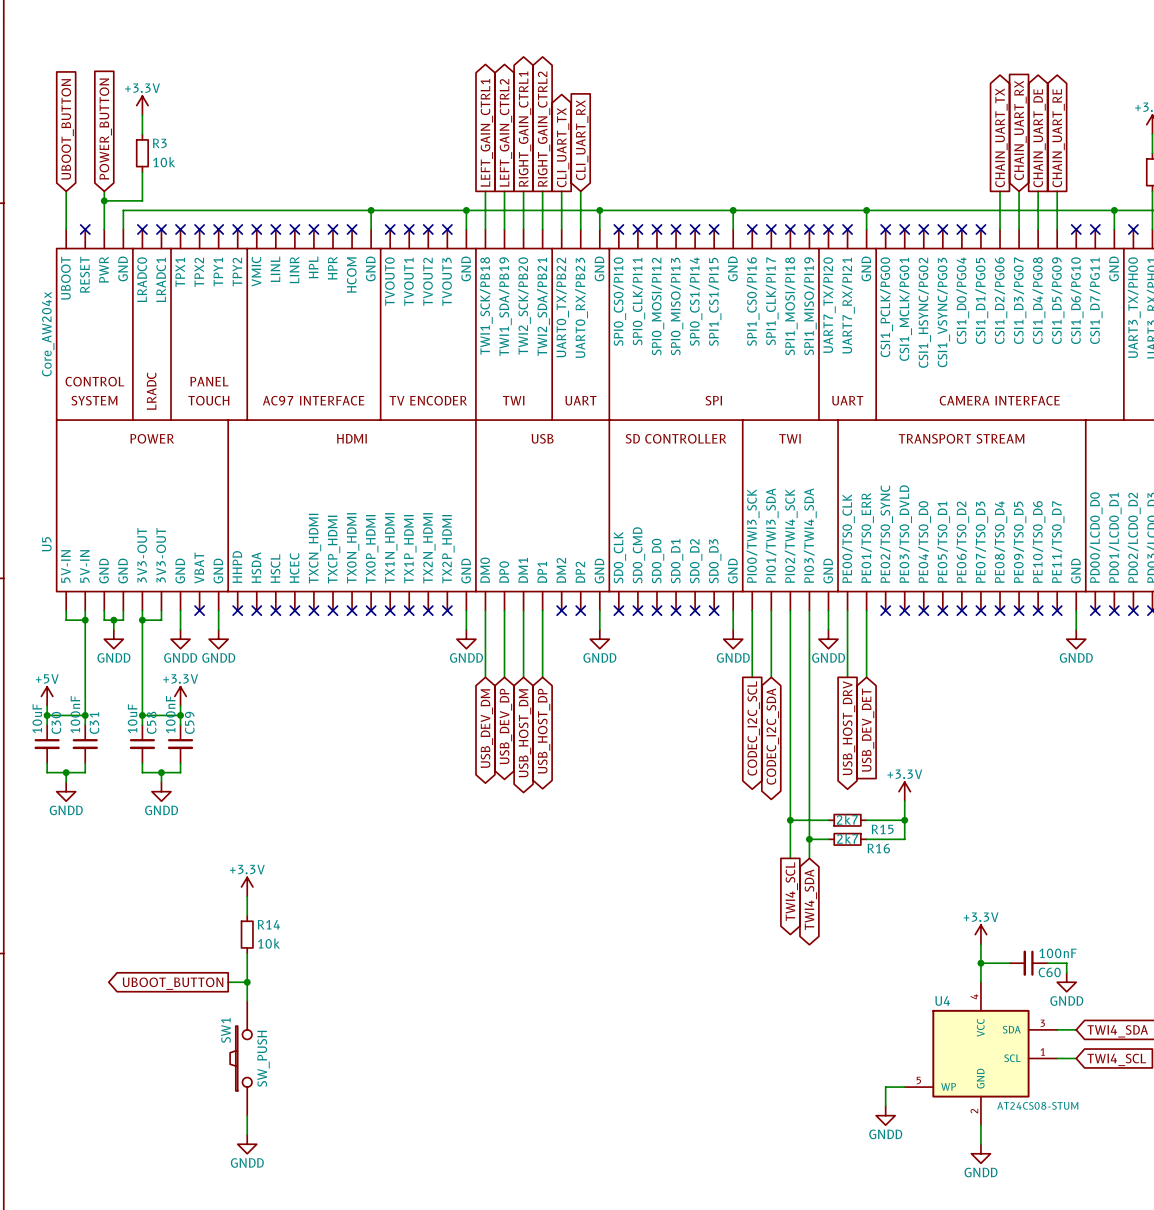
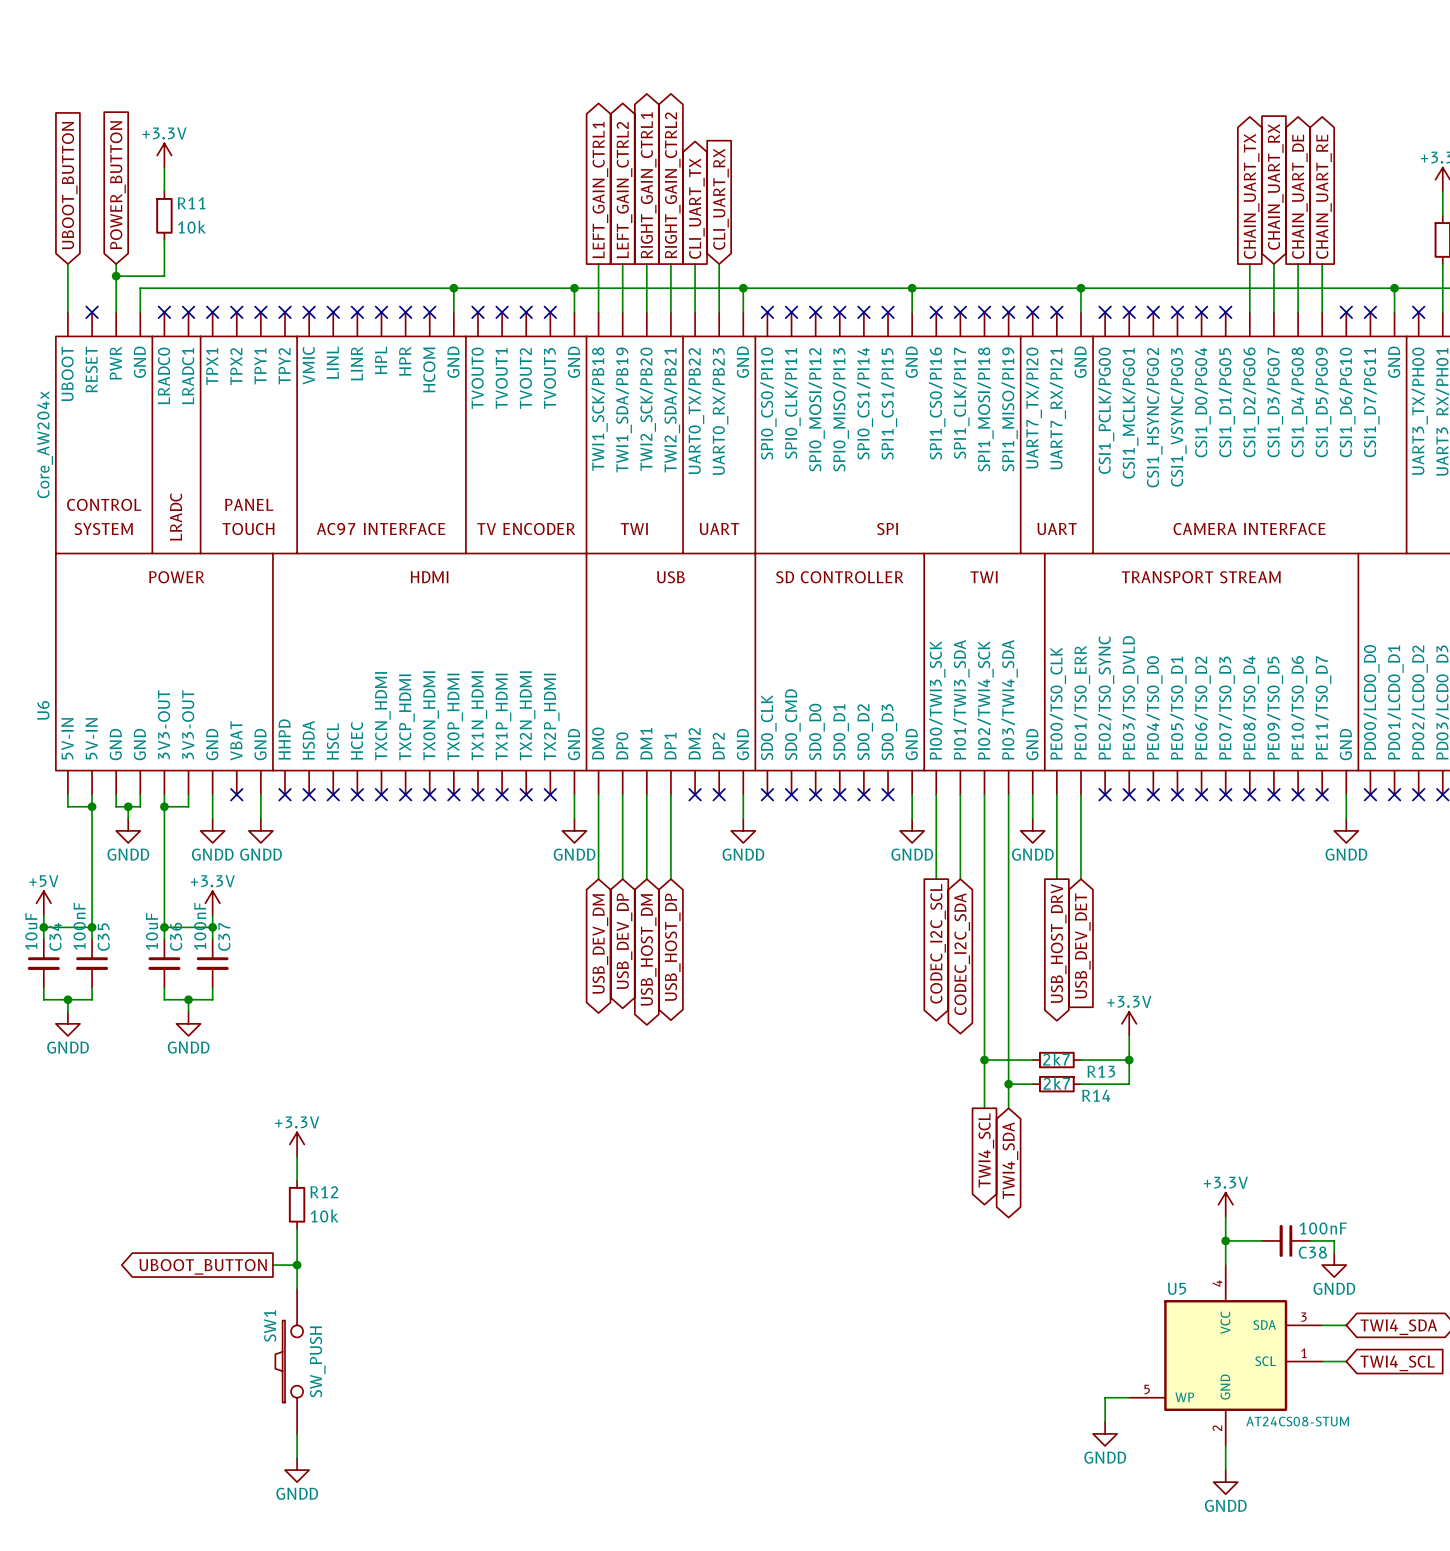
R3 name: R3 (159, 143) -> R11 (191, 203)
U5 name: U5 (46, 544) -> U6 (43, 710)
C30 name: C30 (56, 722) -> C34 (55, 936)
C58 name: C58 (151, 722) -> C36 (176, 936)
C59 name: C59 (189, 722) -> C37 (224, 936)
C31 name: C31 (94, 723) -> C35 (103, 937)
R15 name: R15 (882, 829) -> R13 (1101, 1071)
R16 name: R16 (878, 848) -> R14 (1096, 1095)
R14 name: R14 (268, 924) -> R12 (324, 1192)
C60 name: C60 (1049, 972) -> C38 (1312, 1252)
U4 name: U4 (942, 1001) -> U5 (1177, 1288)

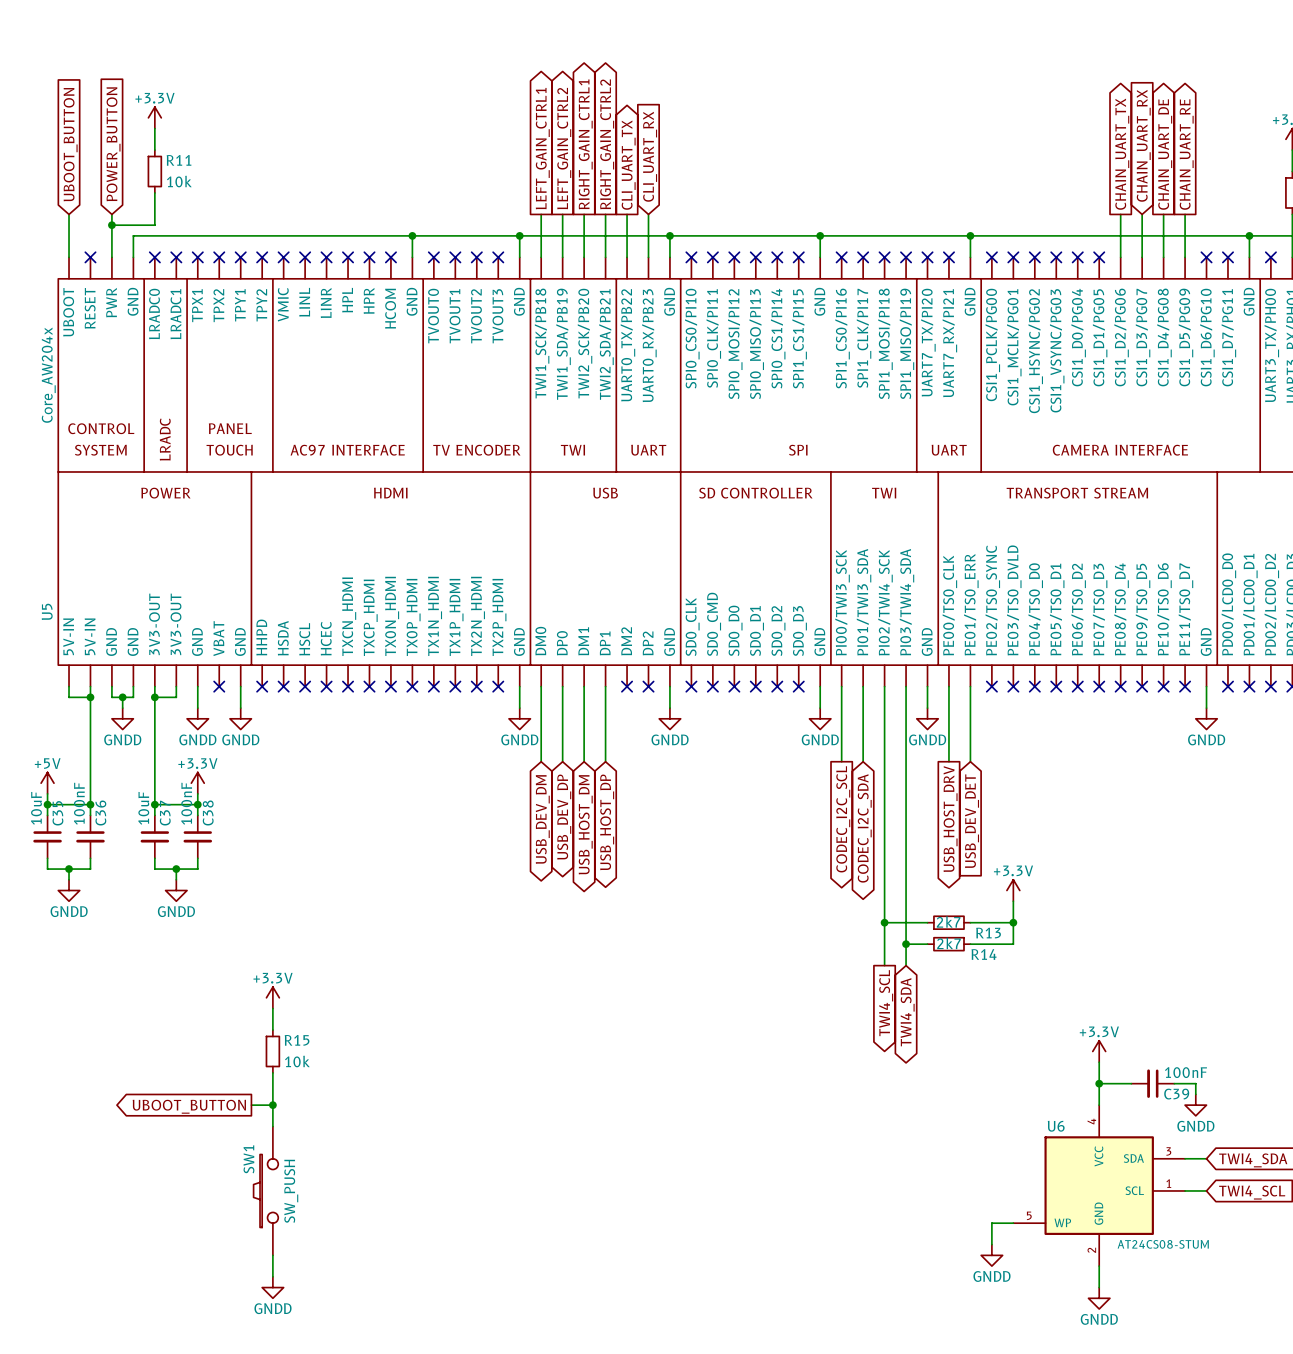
U6 name: U6 (43, 710) -> U5 (47, 611)
C34 name: C34 (55, 936) -> C35 (57, 813)
C36 name: C36 (176, 936) -> C37 (165, 813)
C37 name: C37 (224, 936) -> C38 (208, 812)
C35 name: C35 (103, 937) -> C36 (100, 813)
R12 name: R12 (324, 1192) -> R15 (297, 1040)
C38 name: C38 (1312, 1252) -> C39 (1176, 1094)
U5 name: U5 (1177, 1288) -> U6 (1056, 1126)

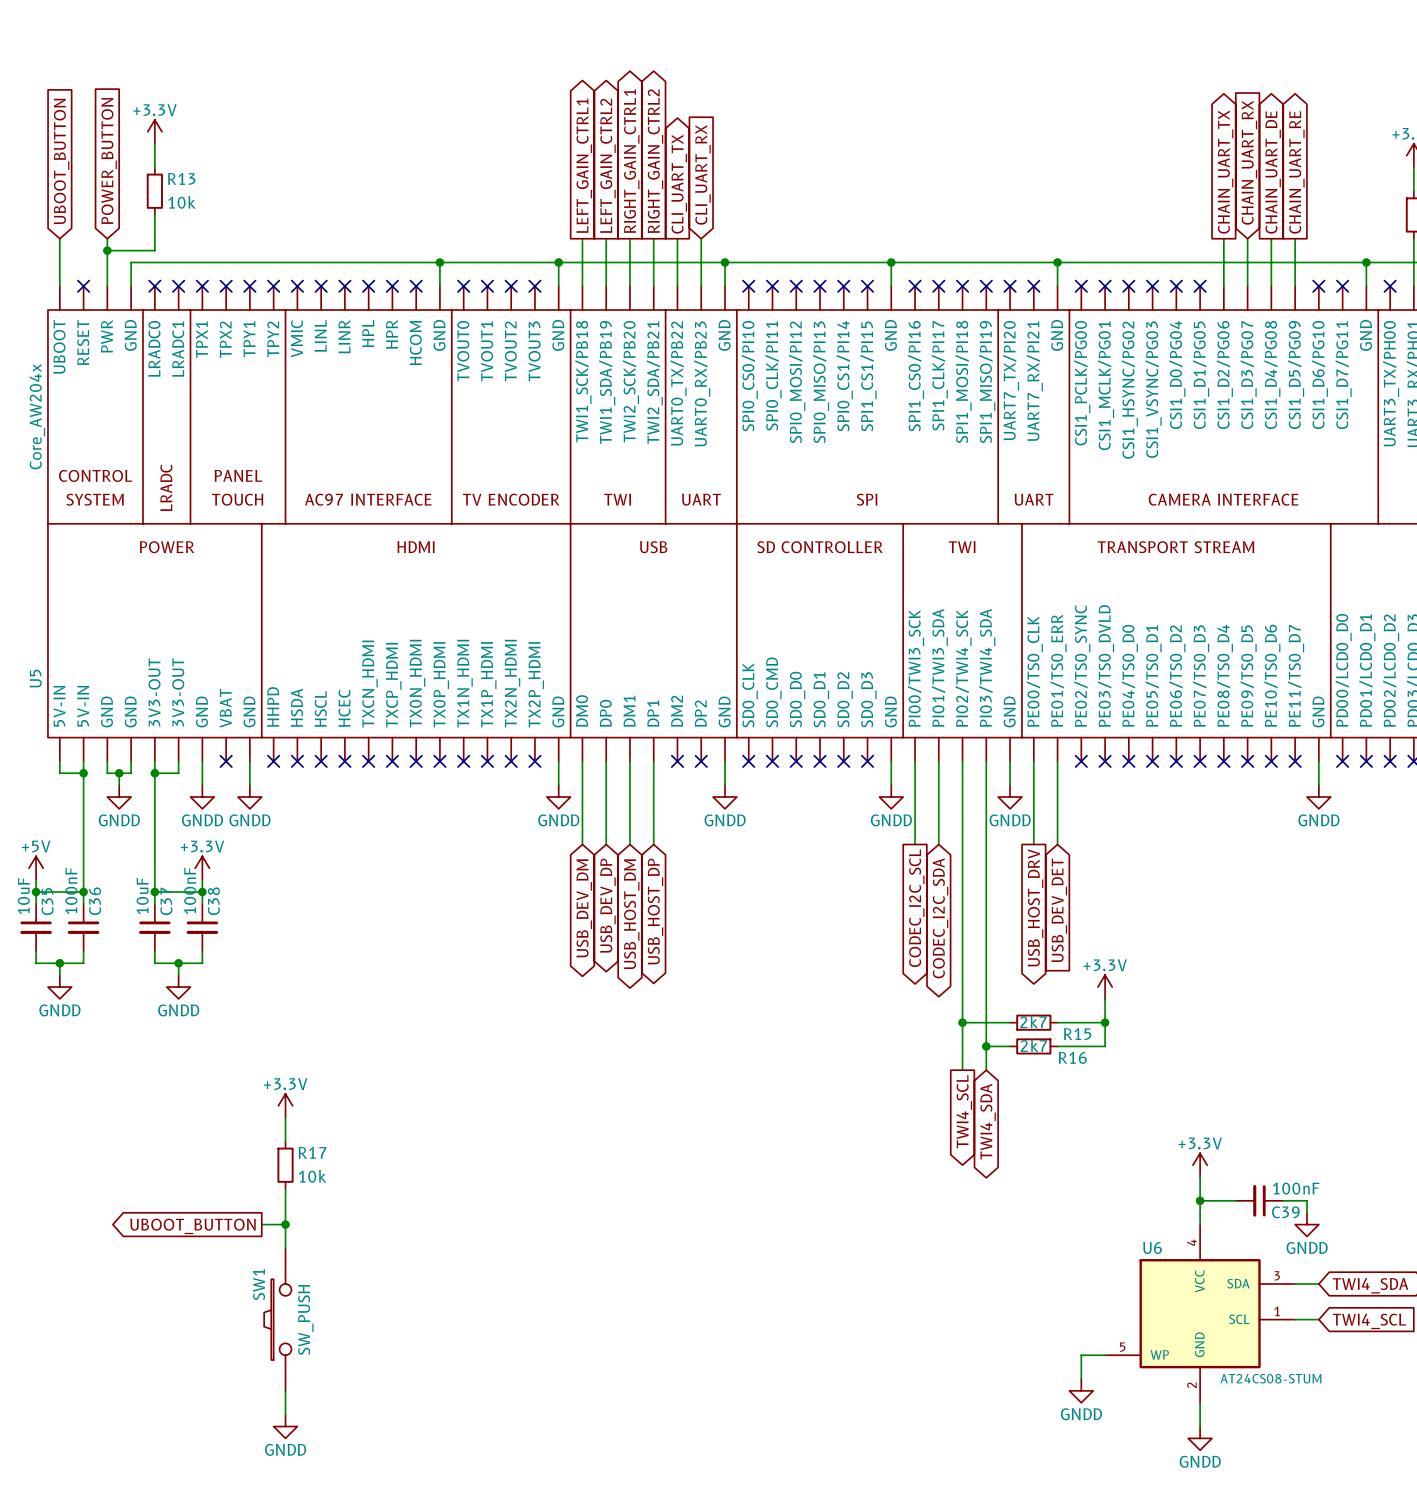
R11 name: R11 (179, 160) -> R13 (181, 178)
R13 name: R13 (988, 933) -> R15 (1077, 1034)
R14 name: R14 (984, 954) -> R16 (1072, 1057)
R15 name: R15 (297, 1040) -> R17 (312, 1152)

